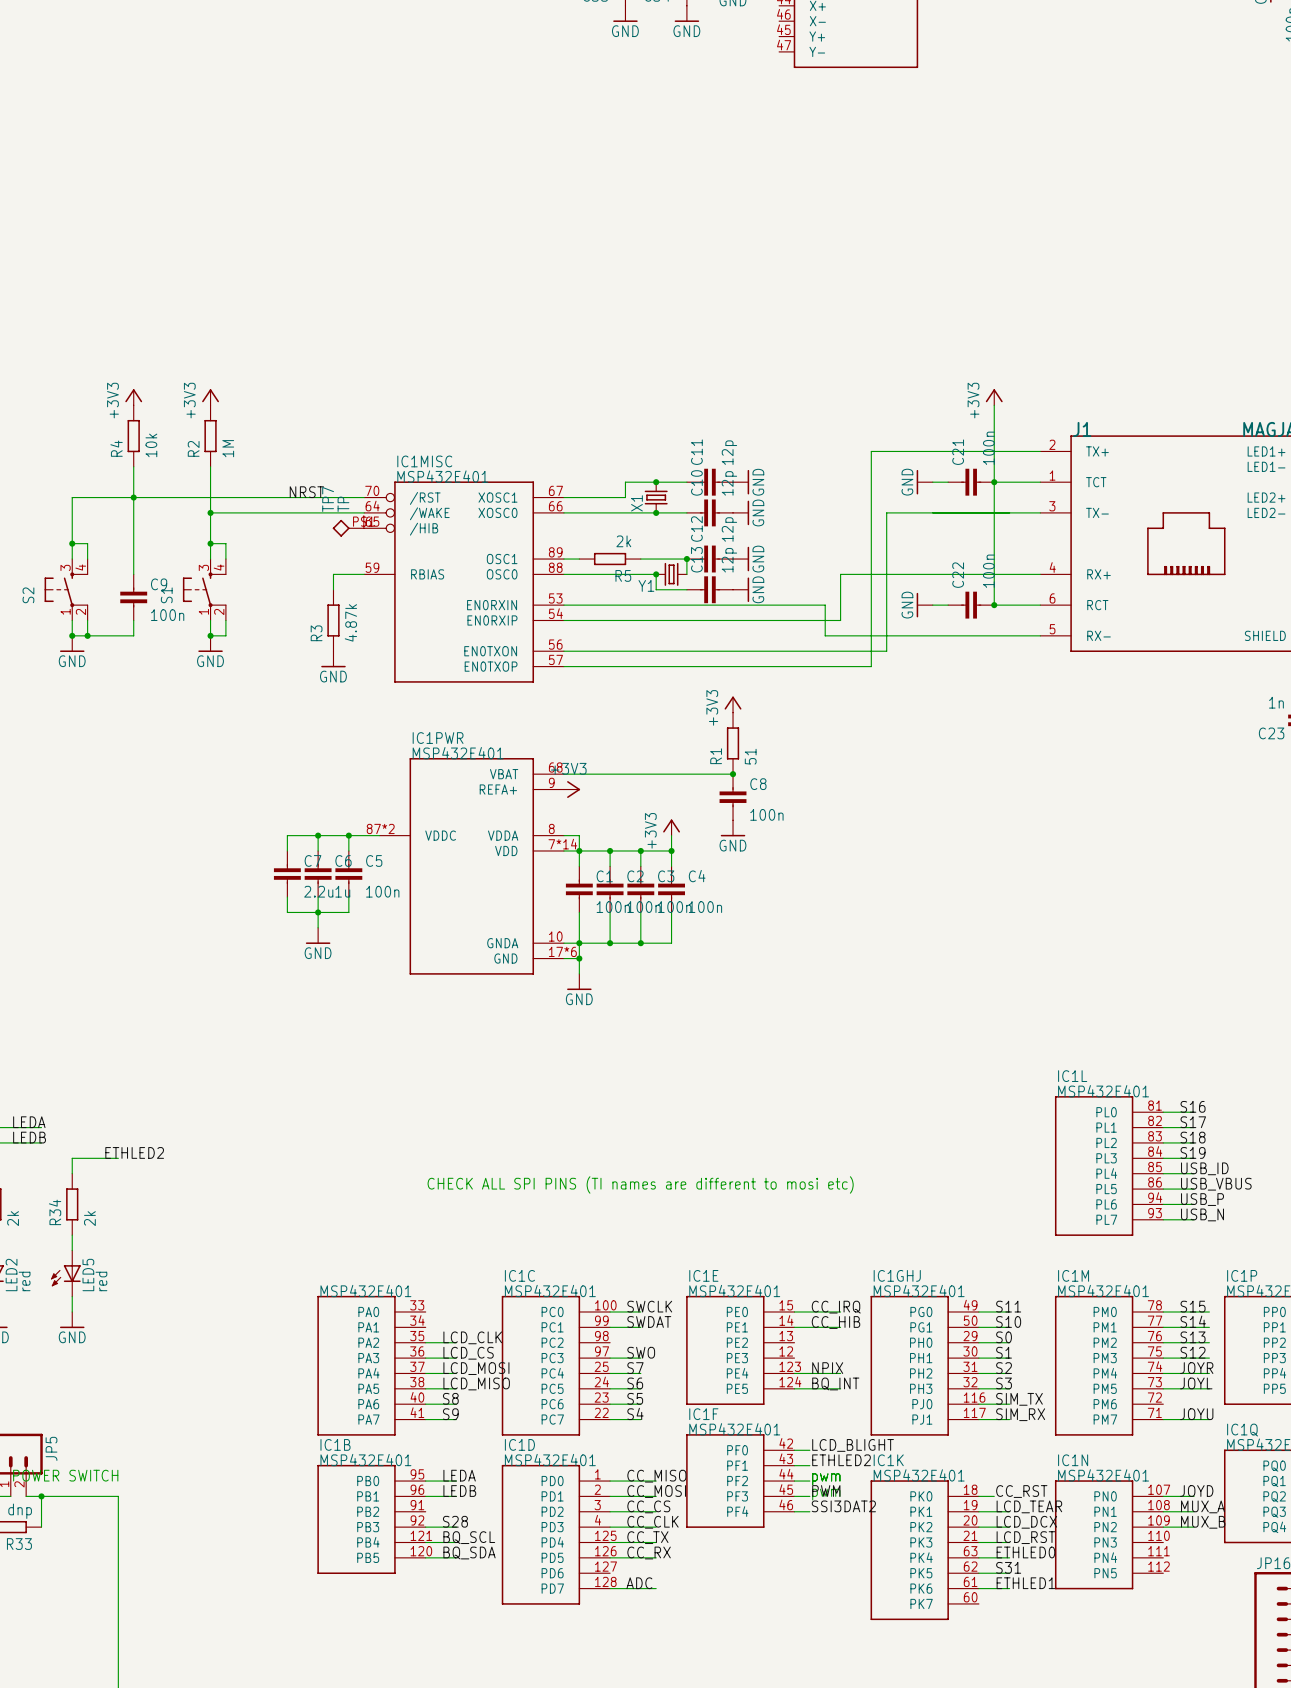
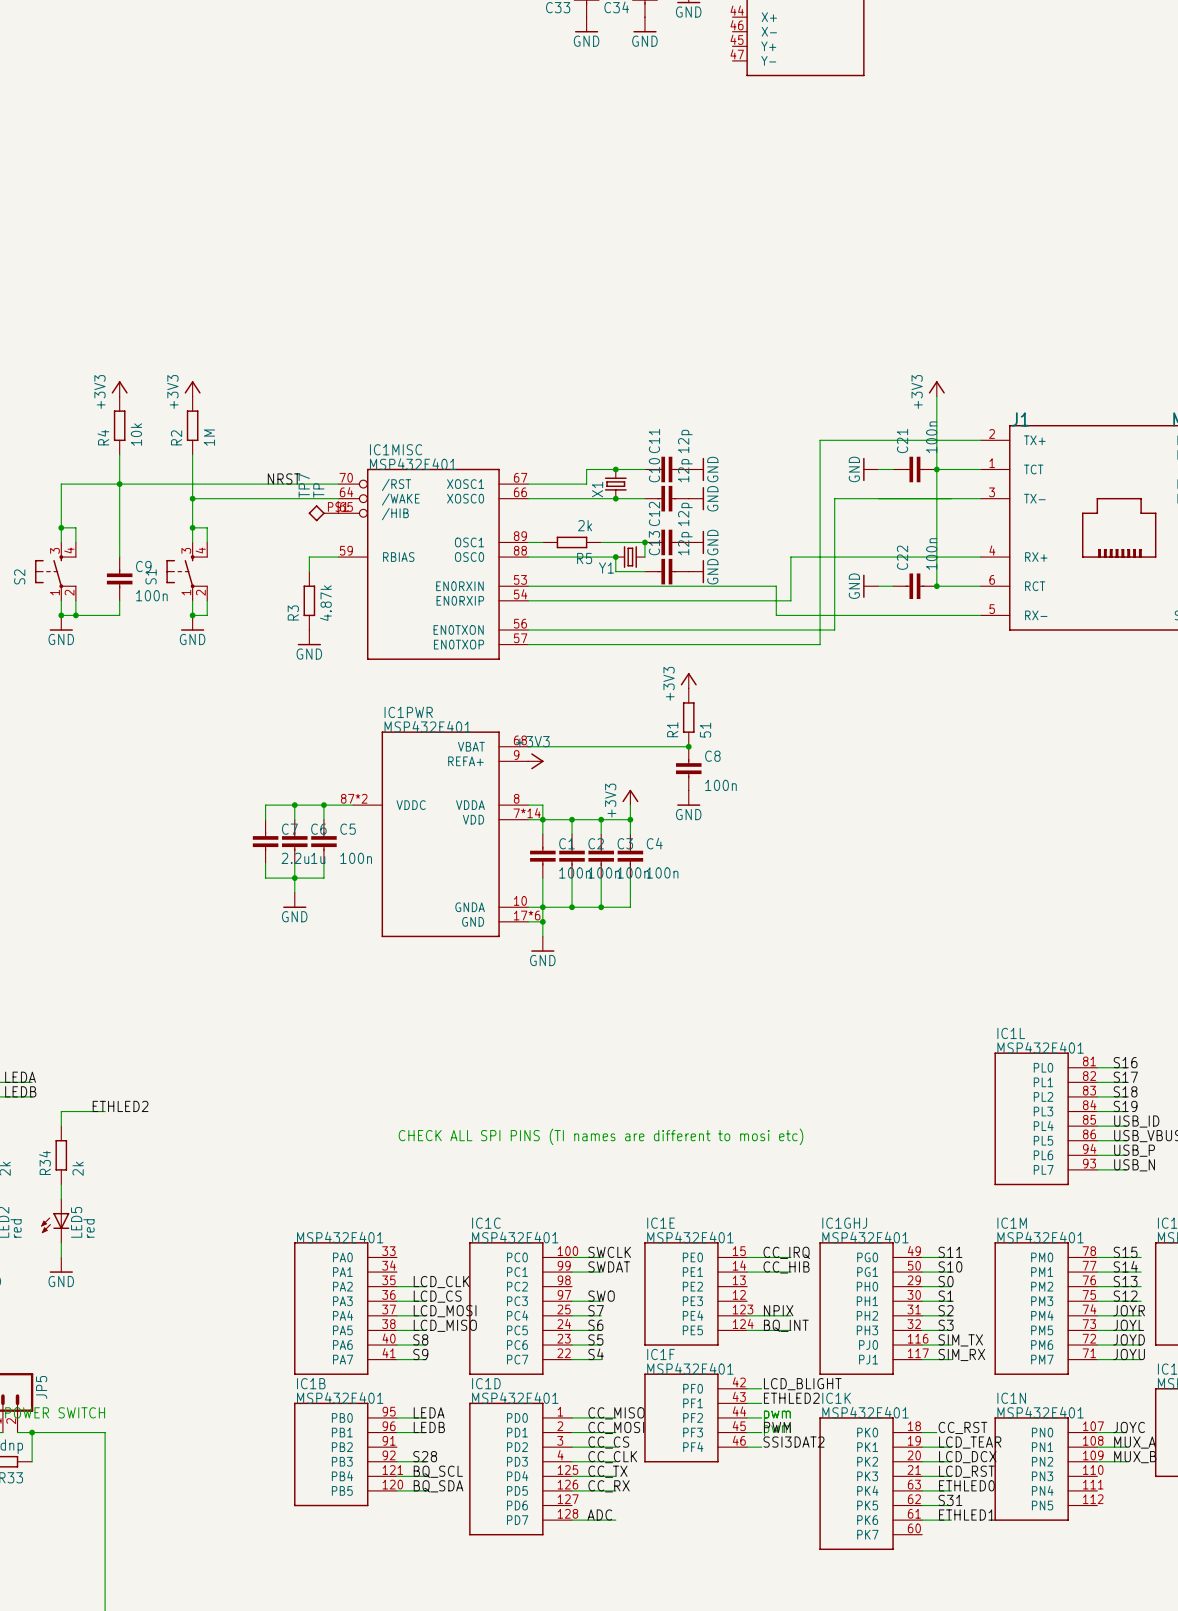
label: none -> JOYD (1129, 1339)
wire: none -> (1097, 1345) (1141, 1345)
label: JOYD (1196, 1491) -> JOYC (1129, 1427)

